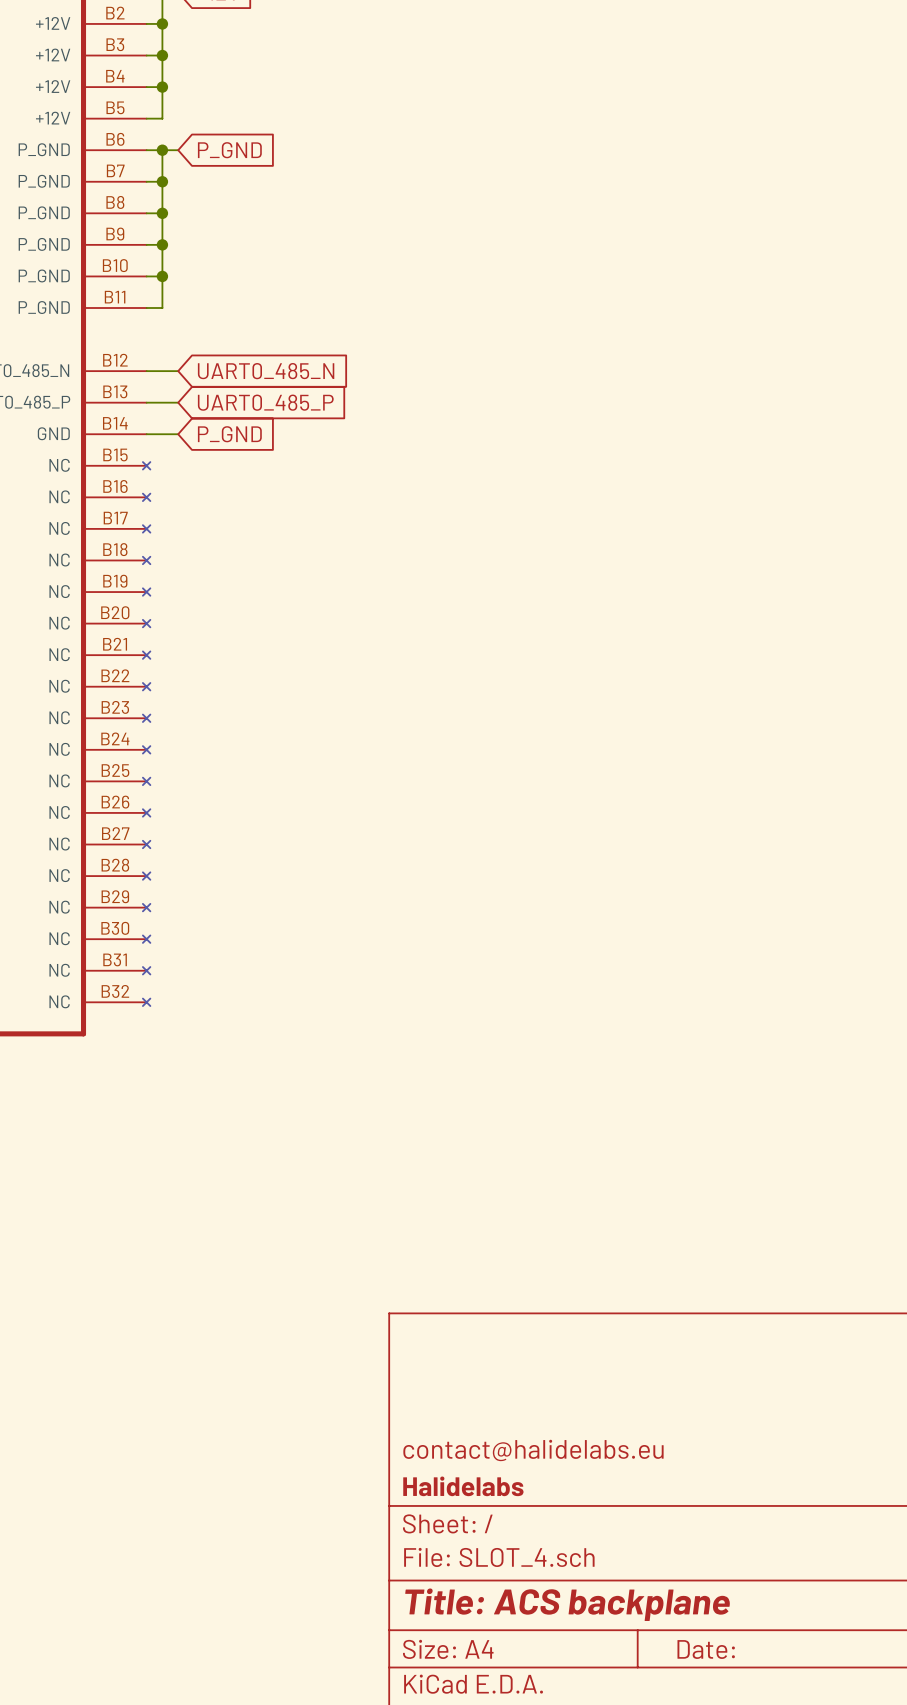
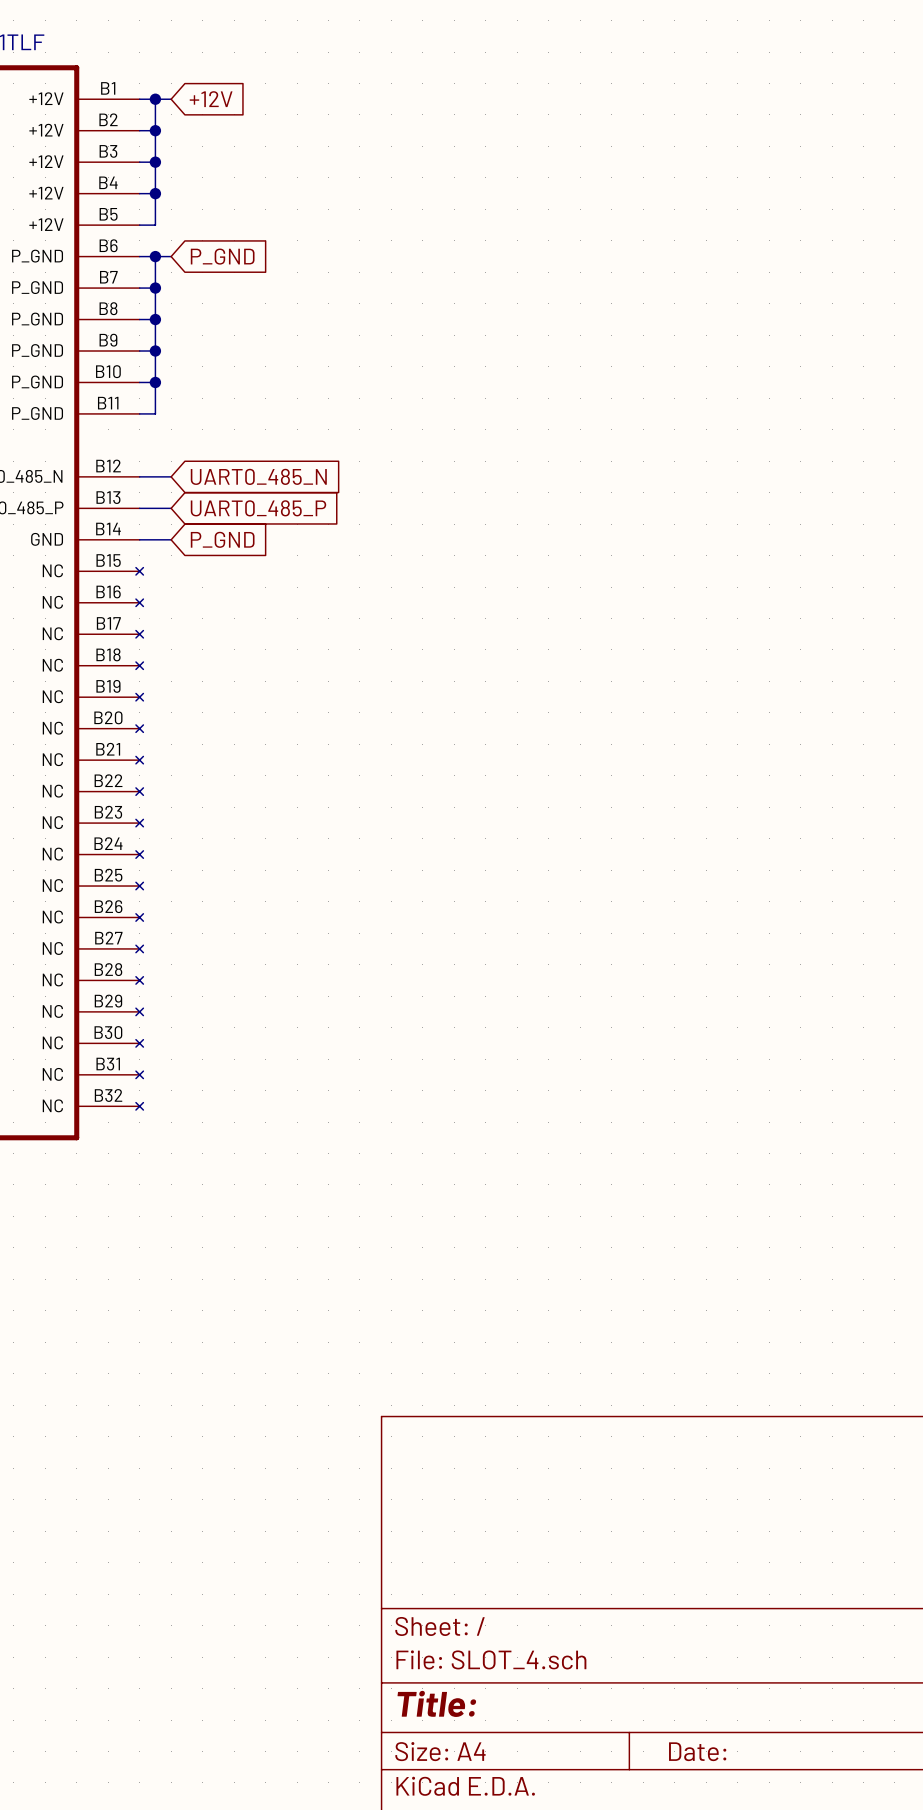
title block: contact@halidelabs.eu (533, 1450) -> none
title block: Halidelabs (463, 1486) -> none
title block: Title: ACS backplane (567, 1604) -> Title: (436, 1703)

